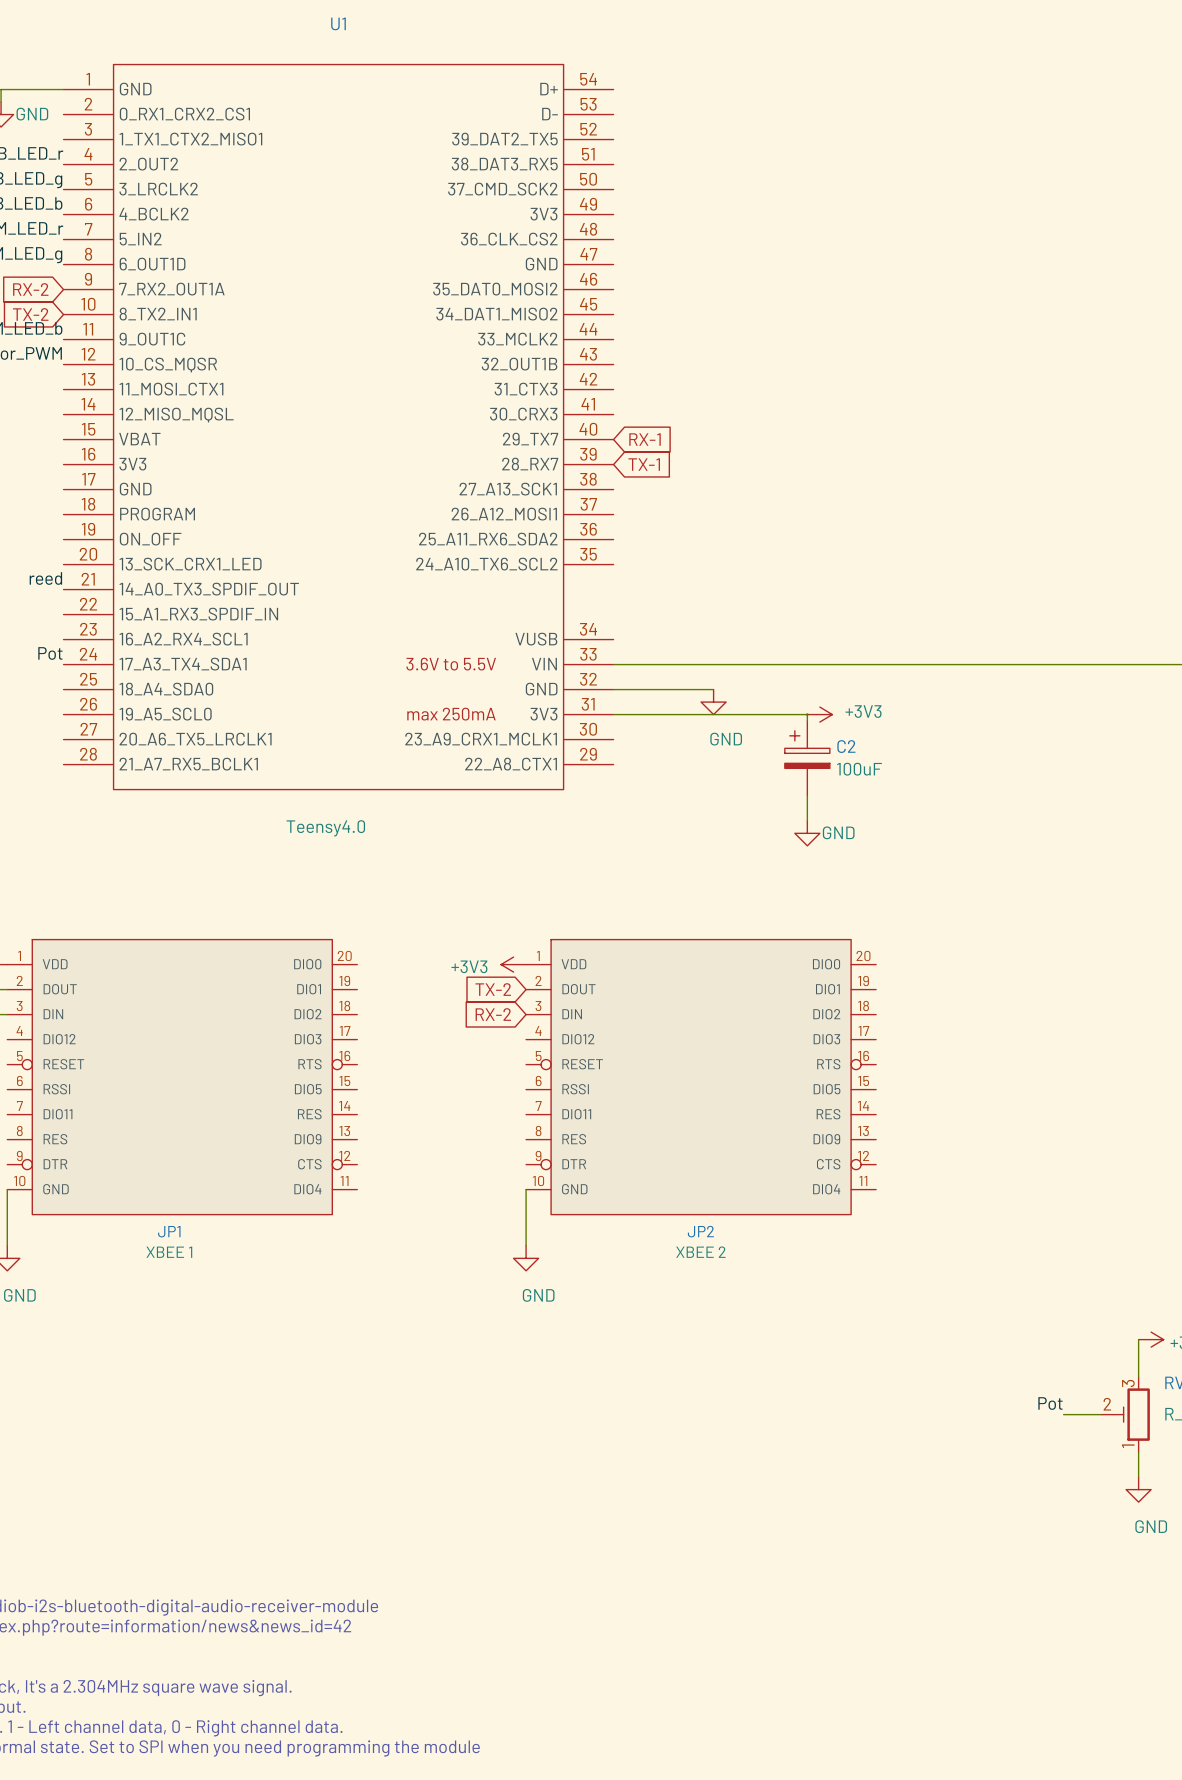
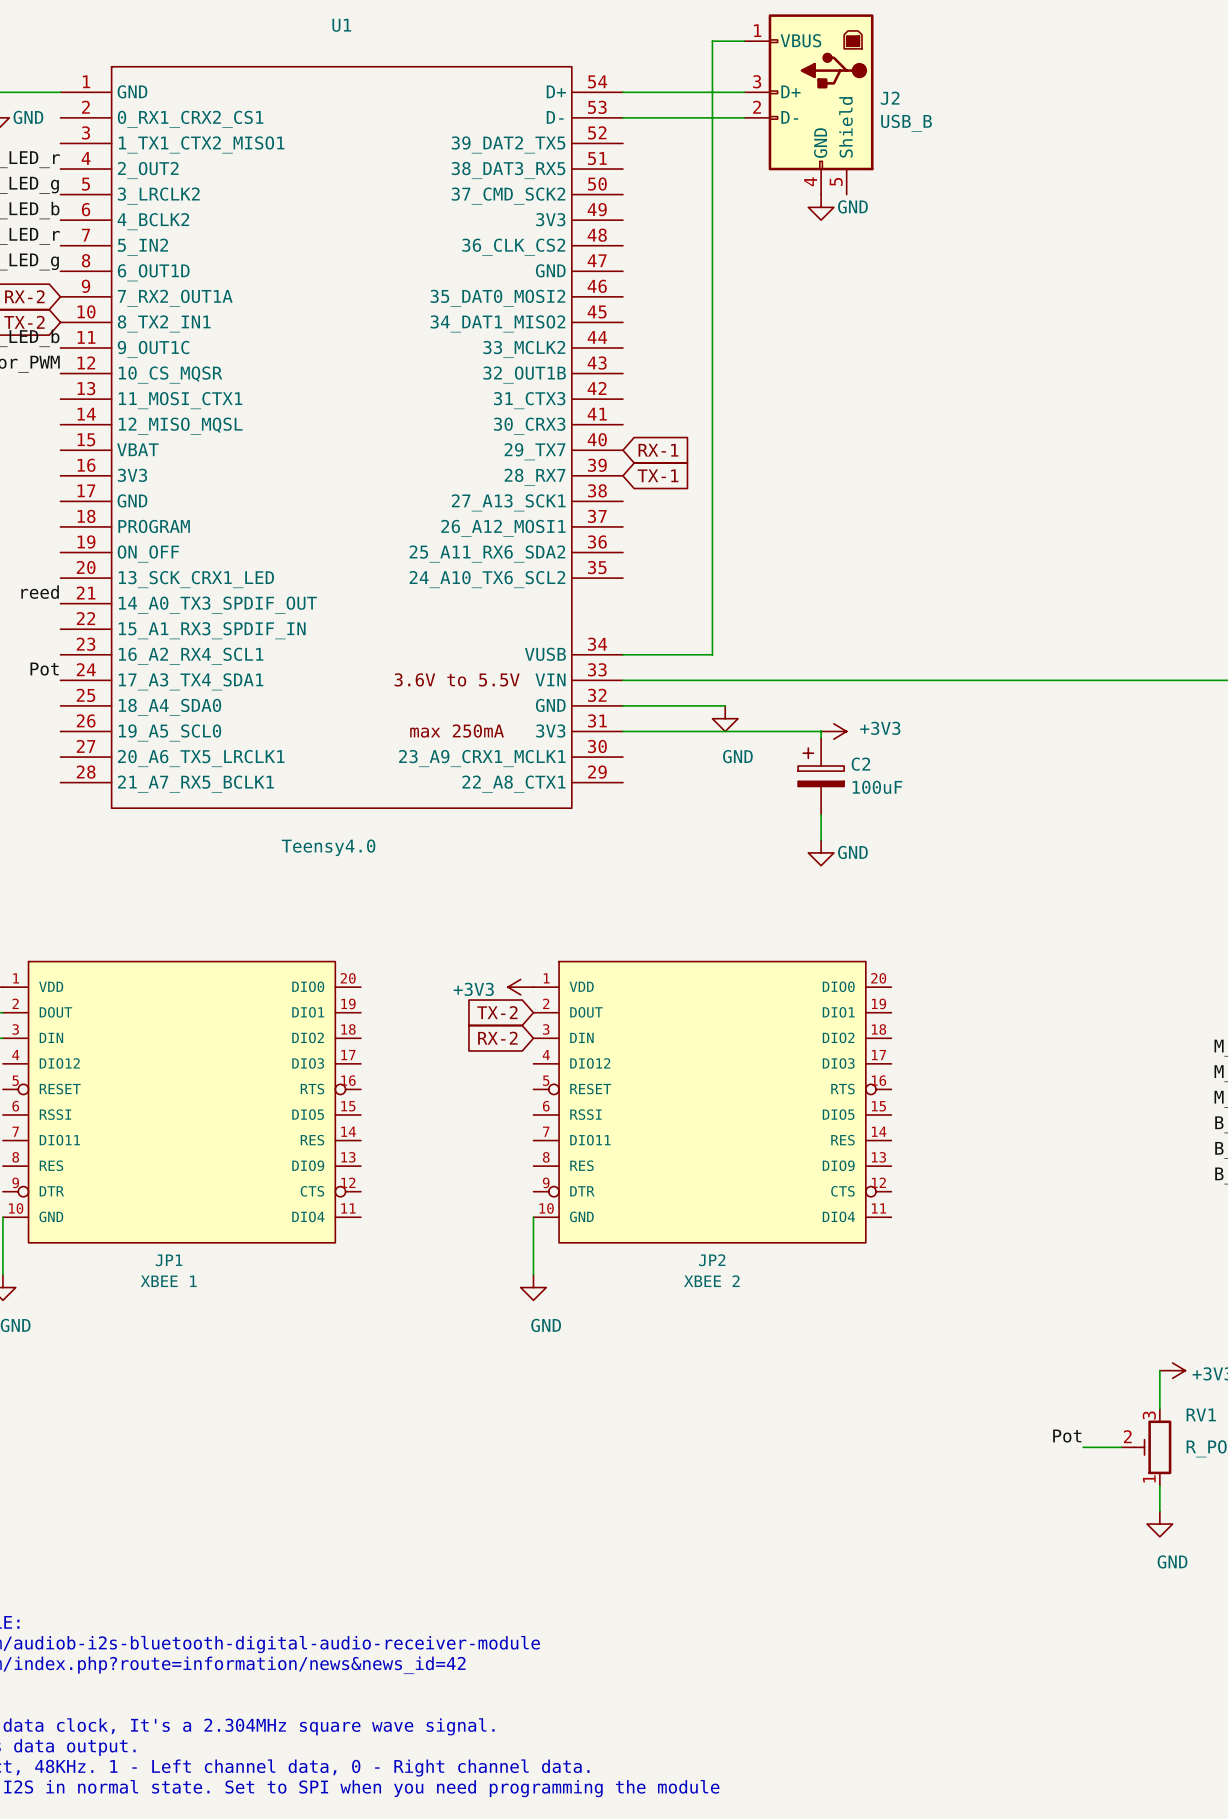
wire: none -> (744, 41) (712, 41) (712, 654) (622, 654)
wire: none -> (622, 92) (744, 92)
J2: none -> USB_B (808, 104)
wire: none -> (622, 117) (744, 117)
power symbol: none -> GND (821, 207)

